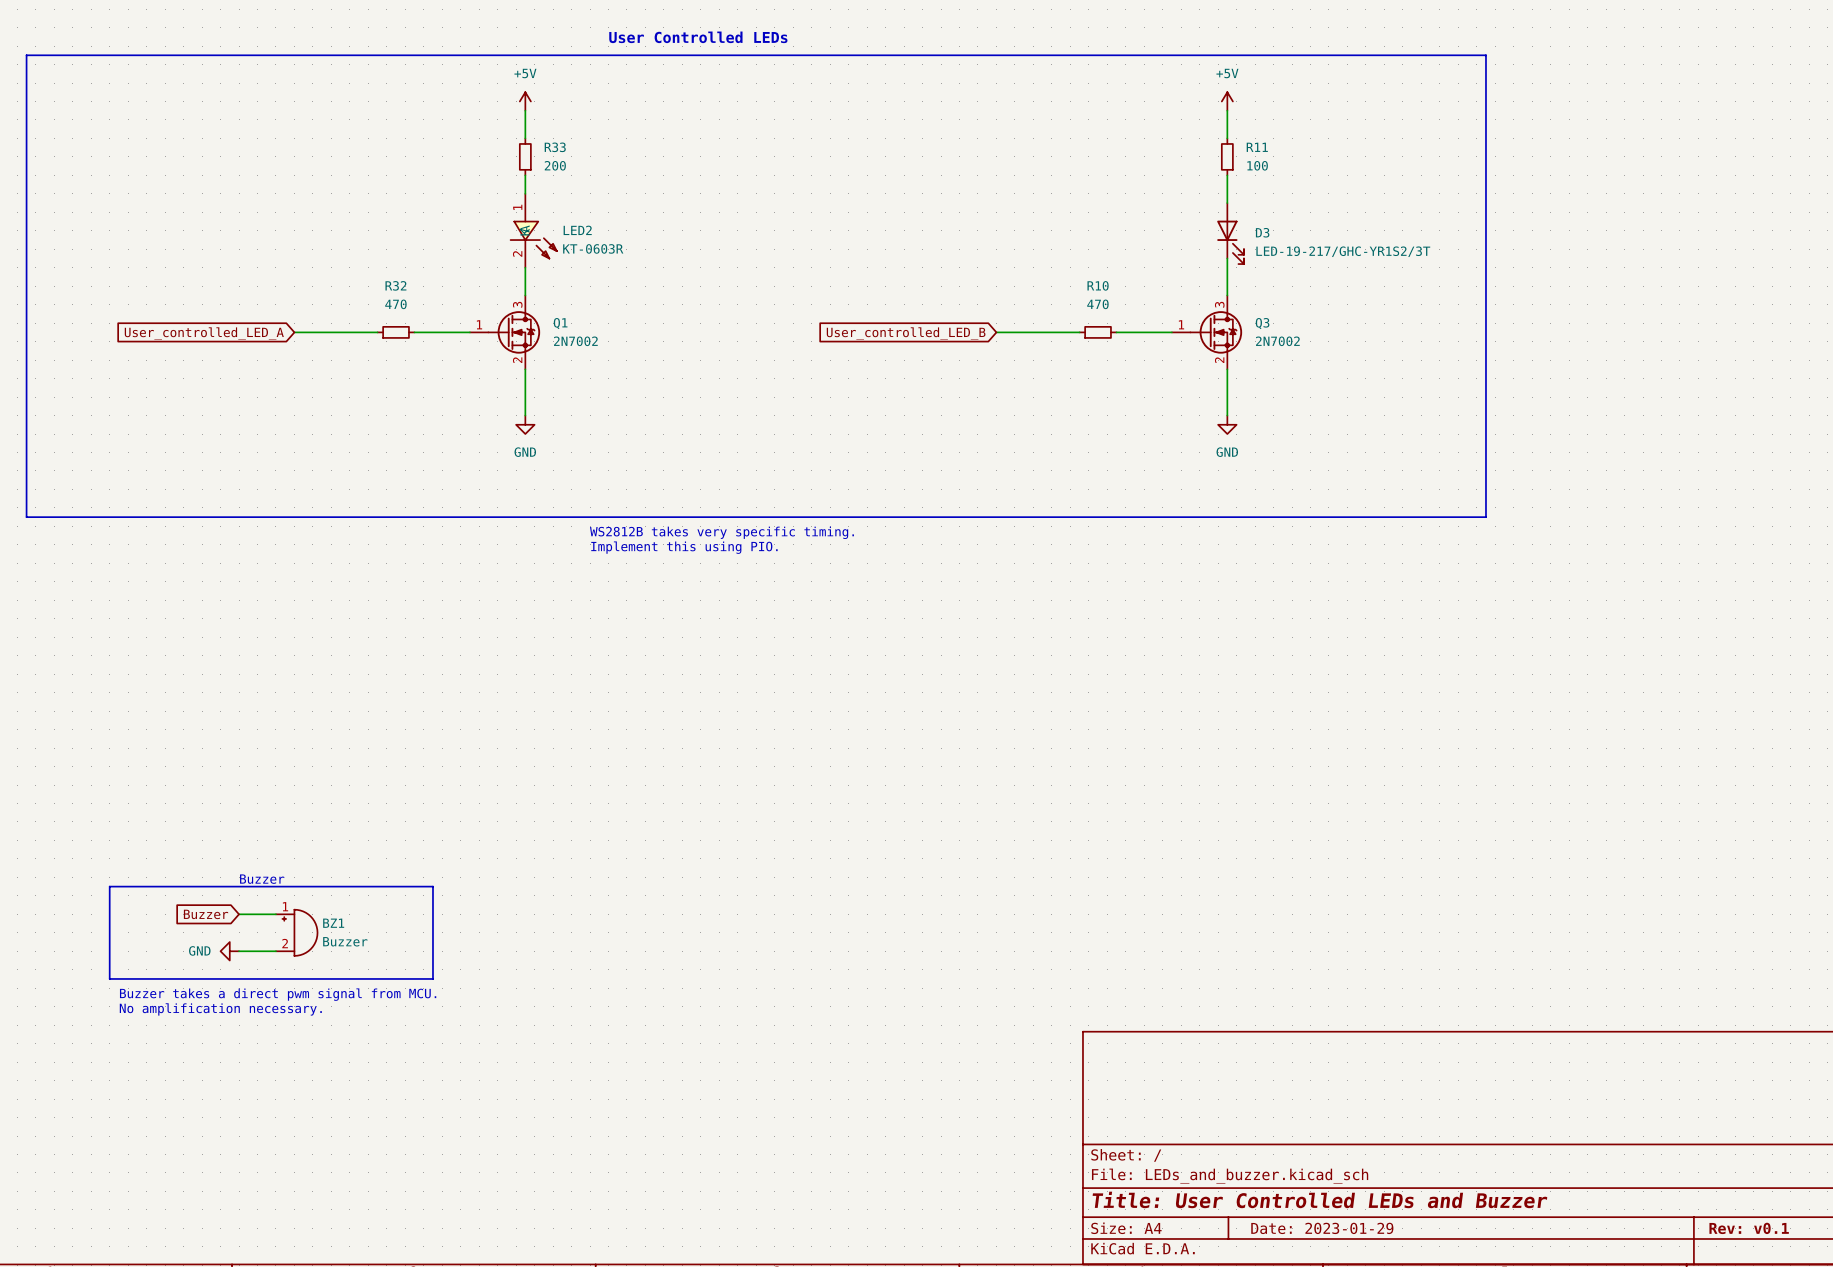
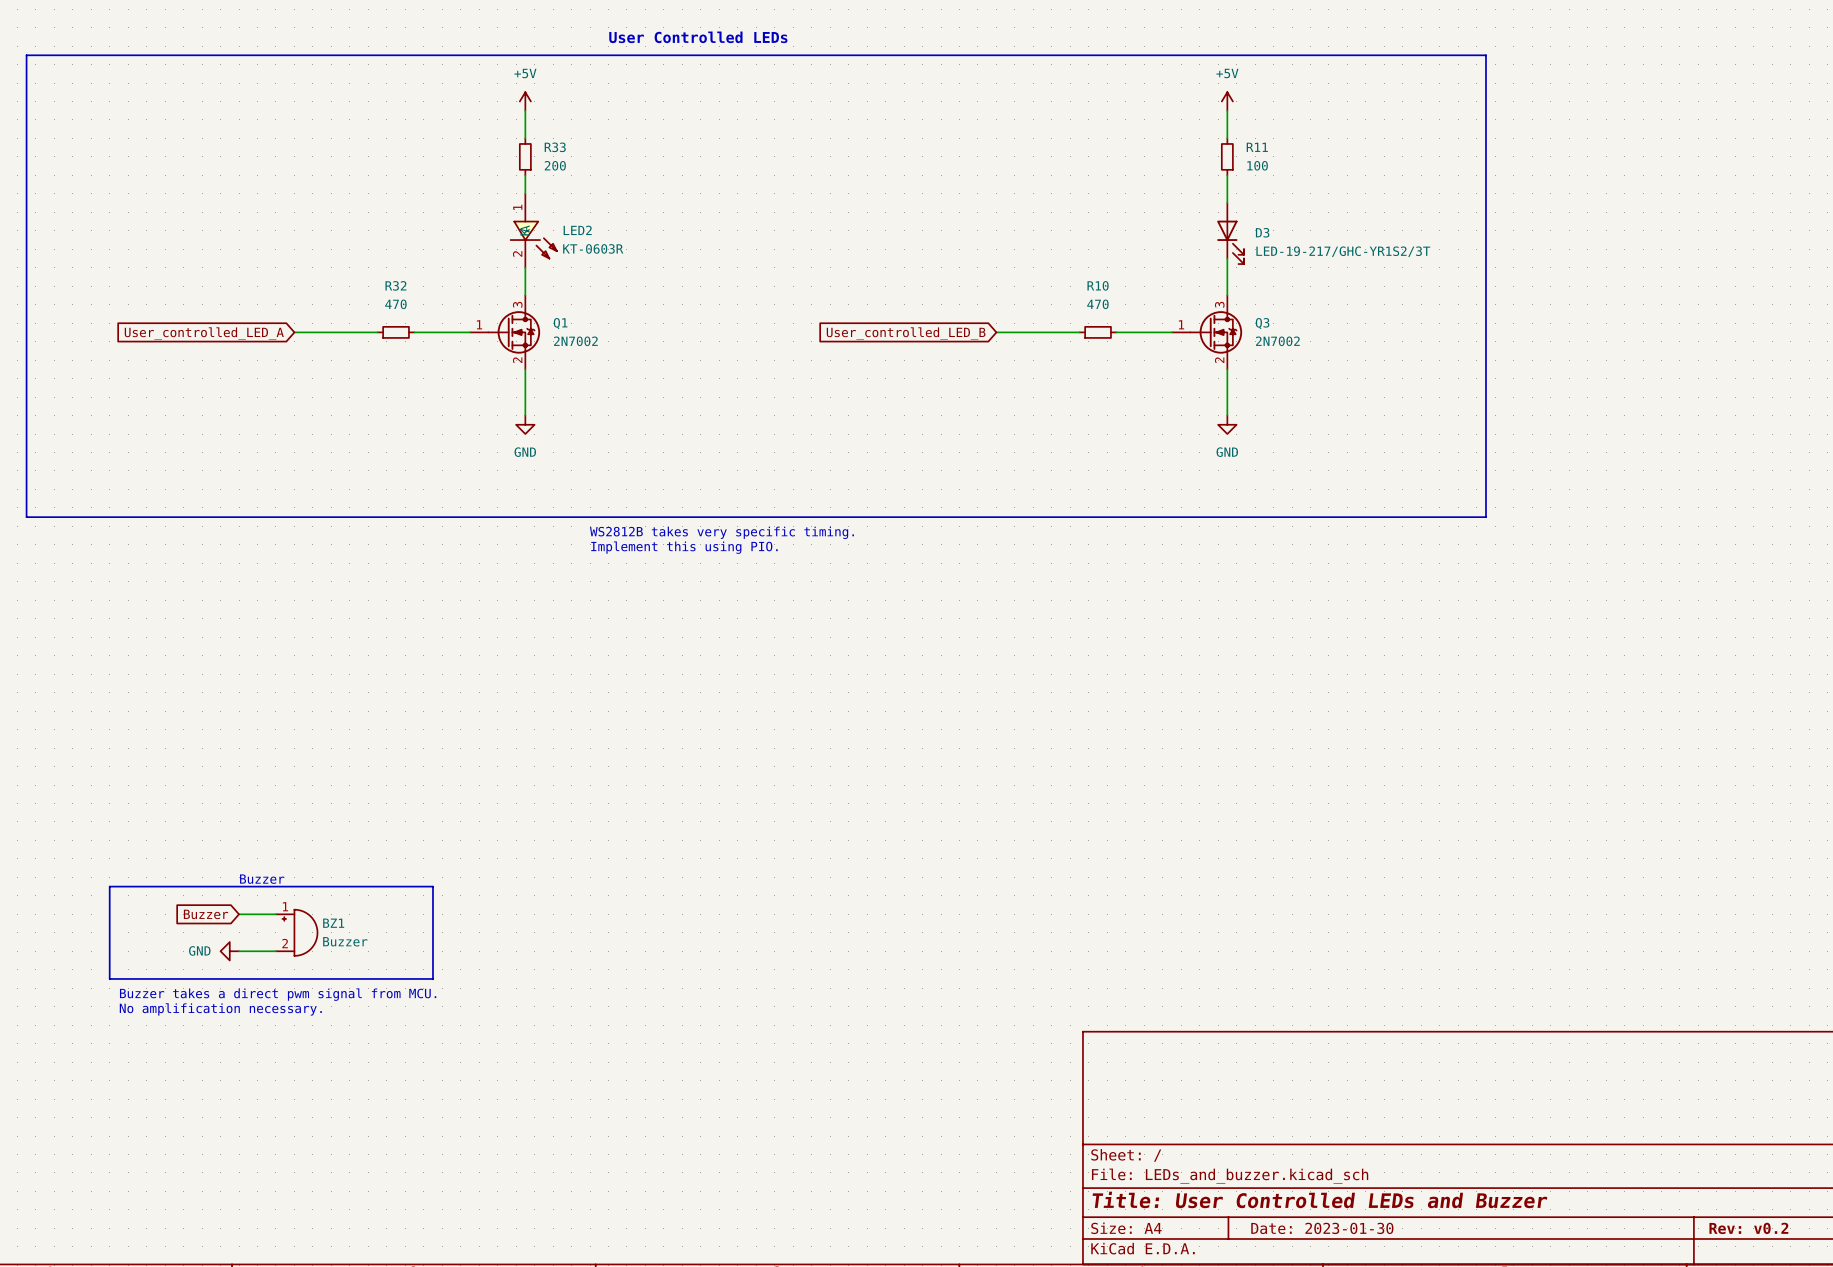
title block: Date: 2023-01-29 (1322, 1228) -> Date: 2023-01-30 (1322, 1228)
title block: Rev: v0.1 (1749, 1228) -> Rev: v0.2 (1748, 1228)

